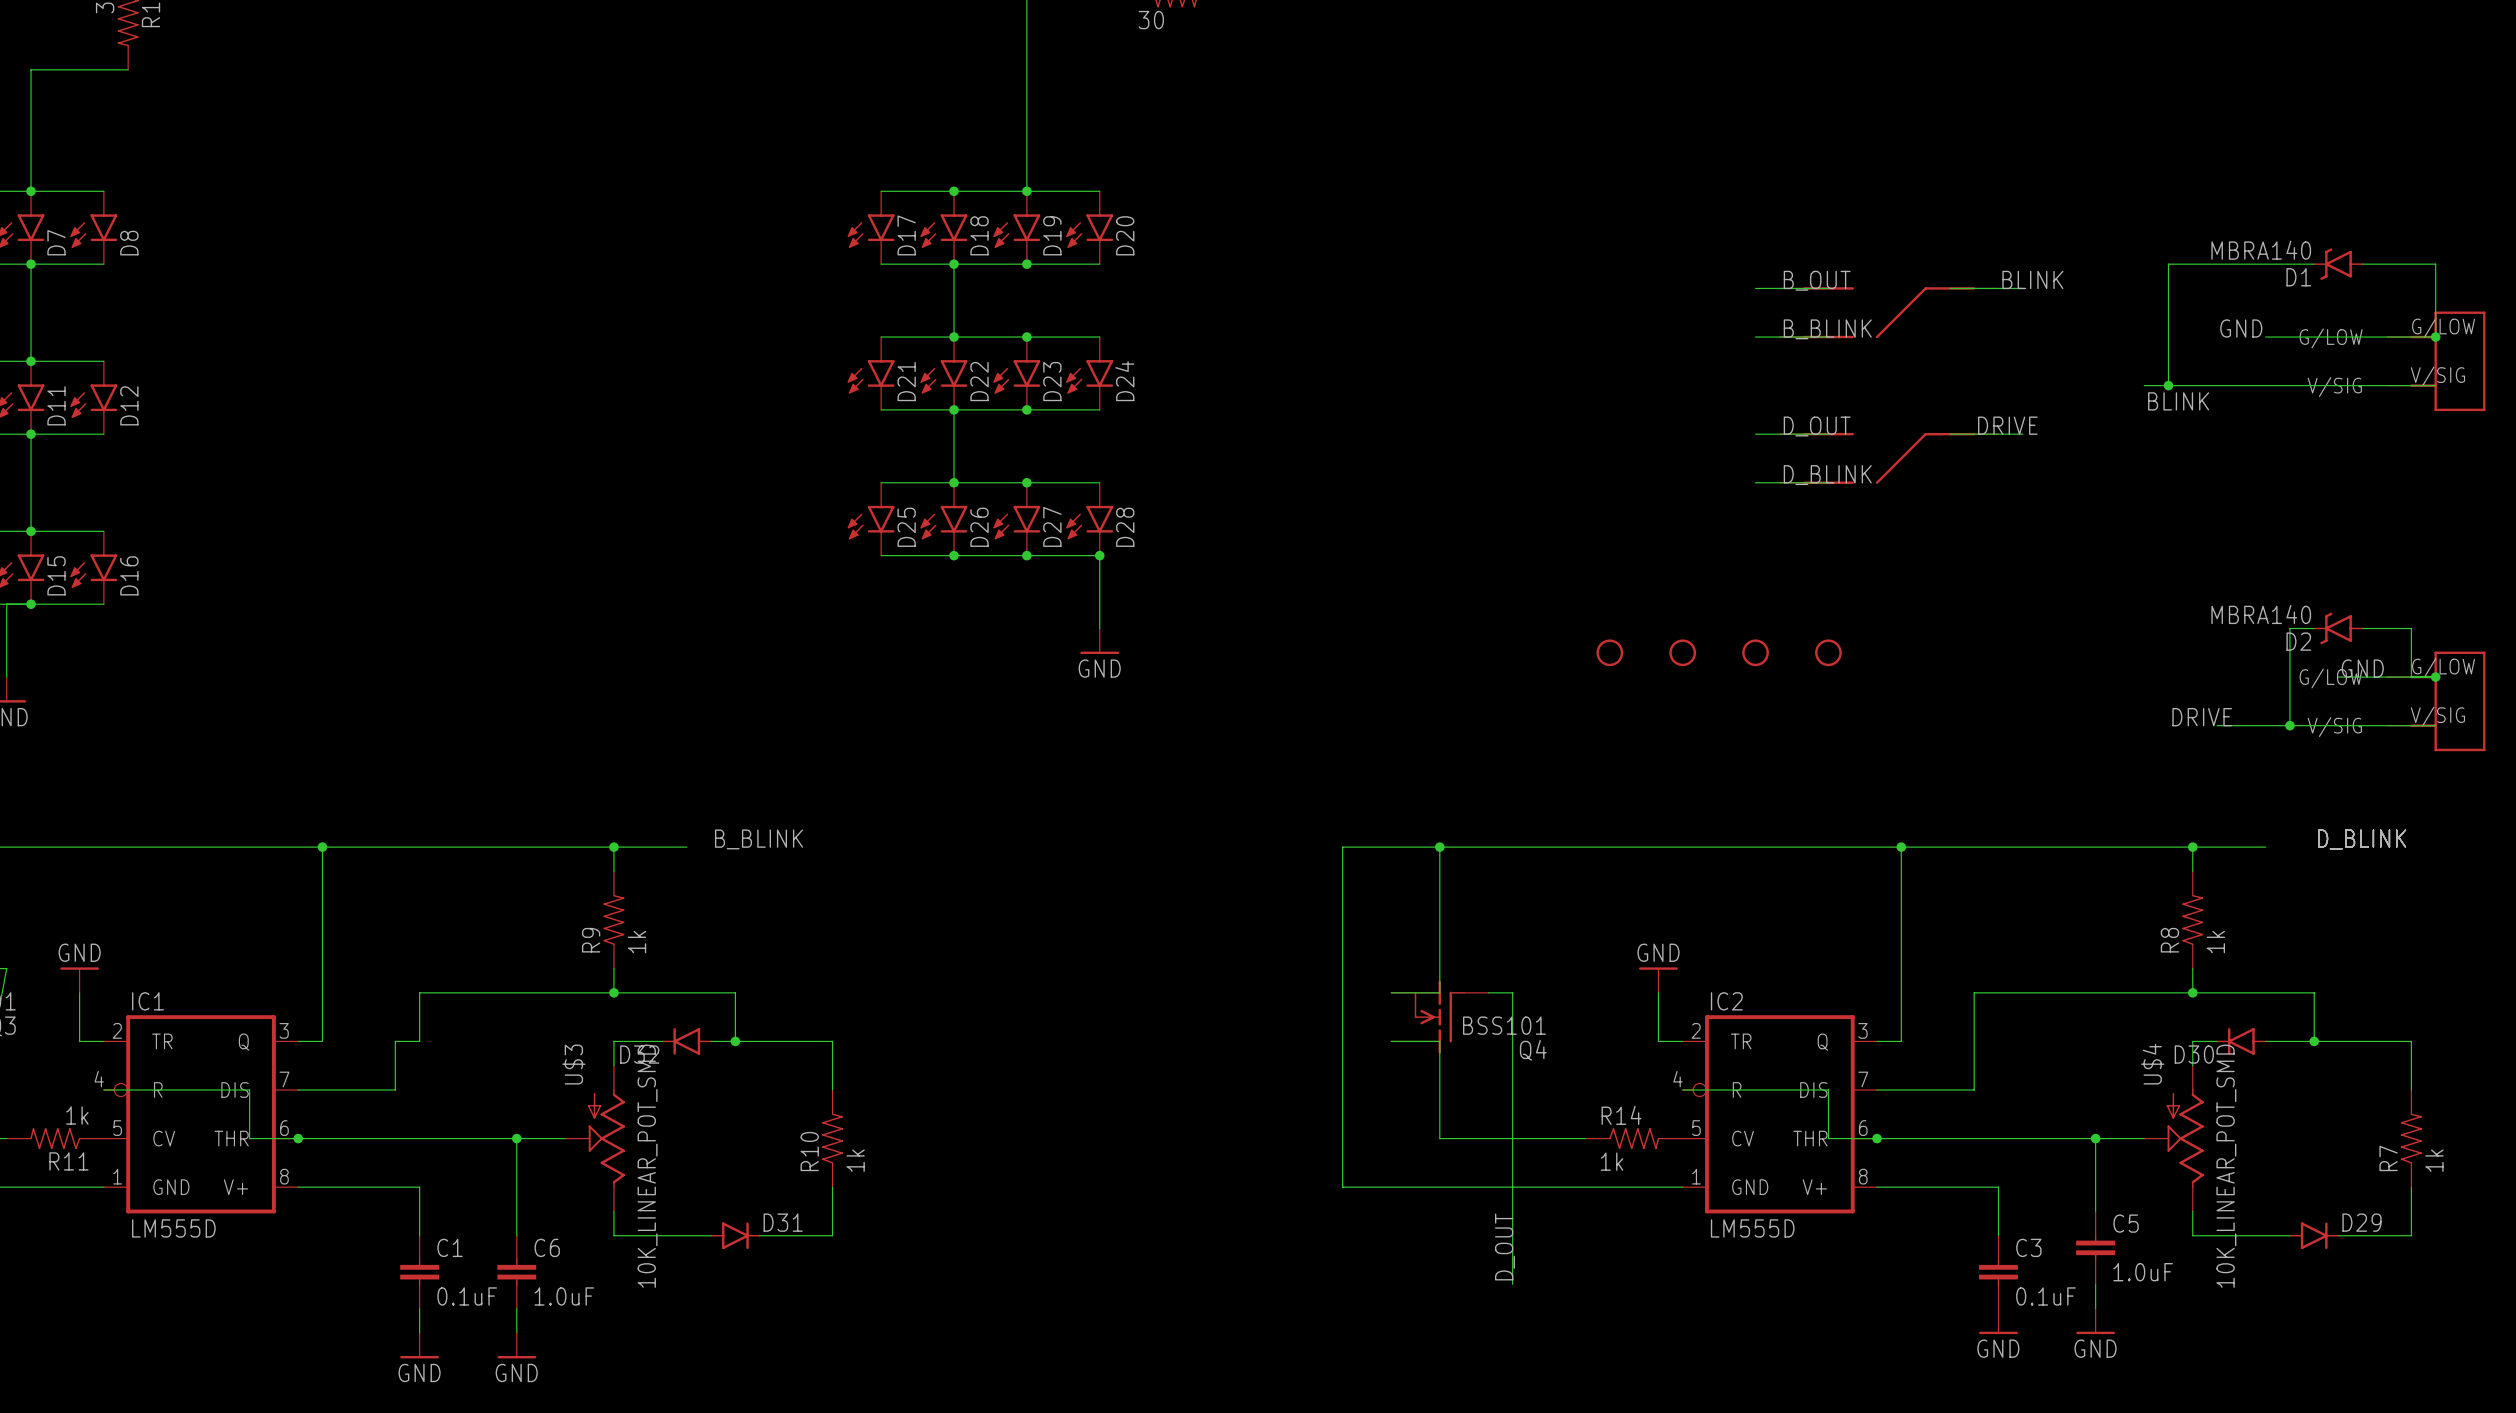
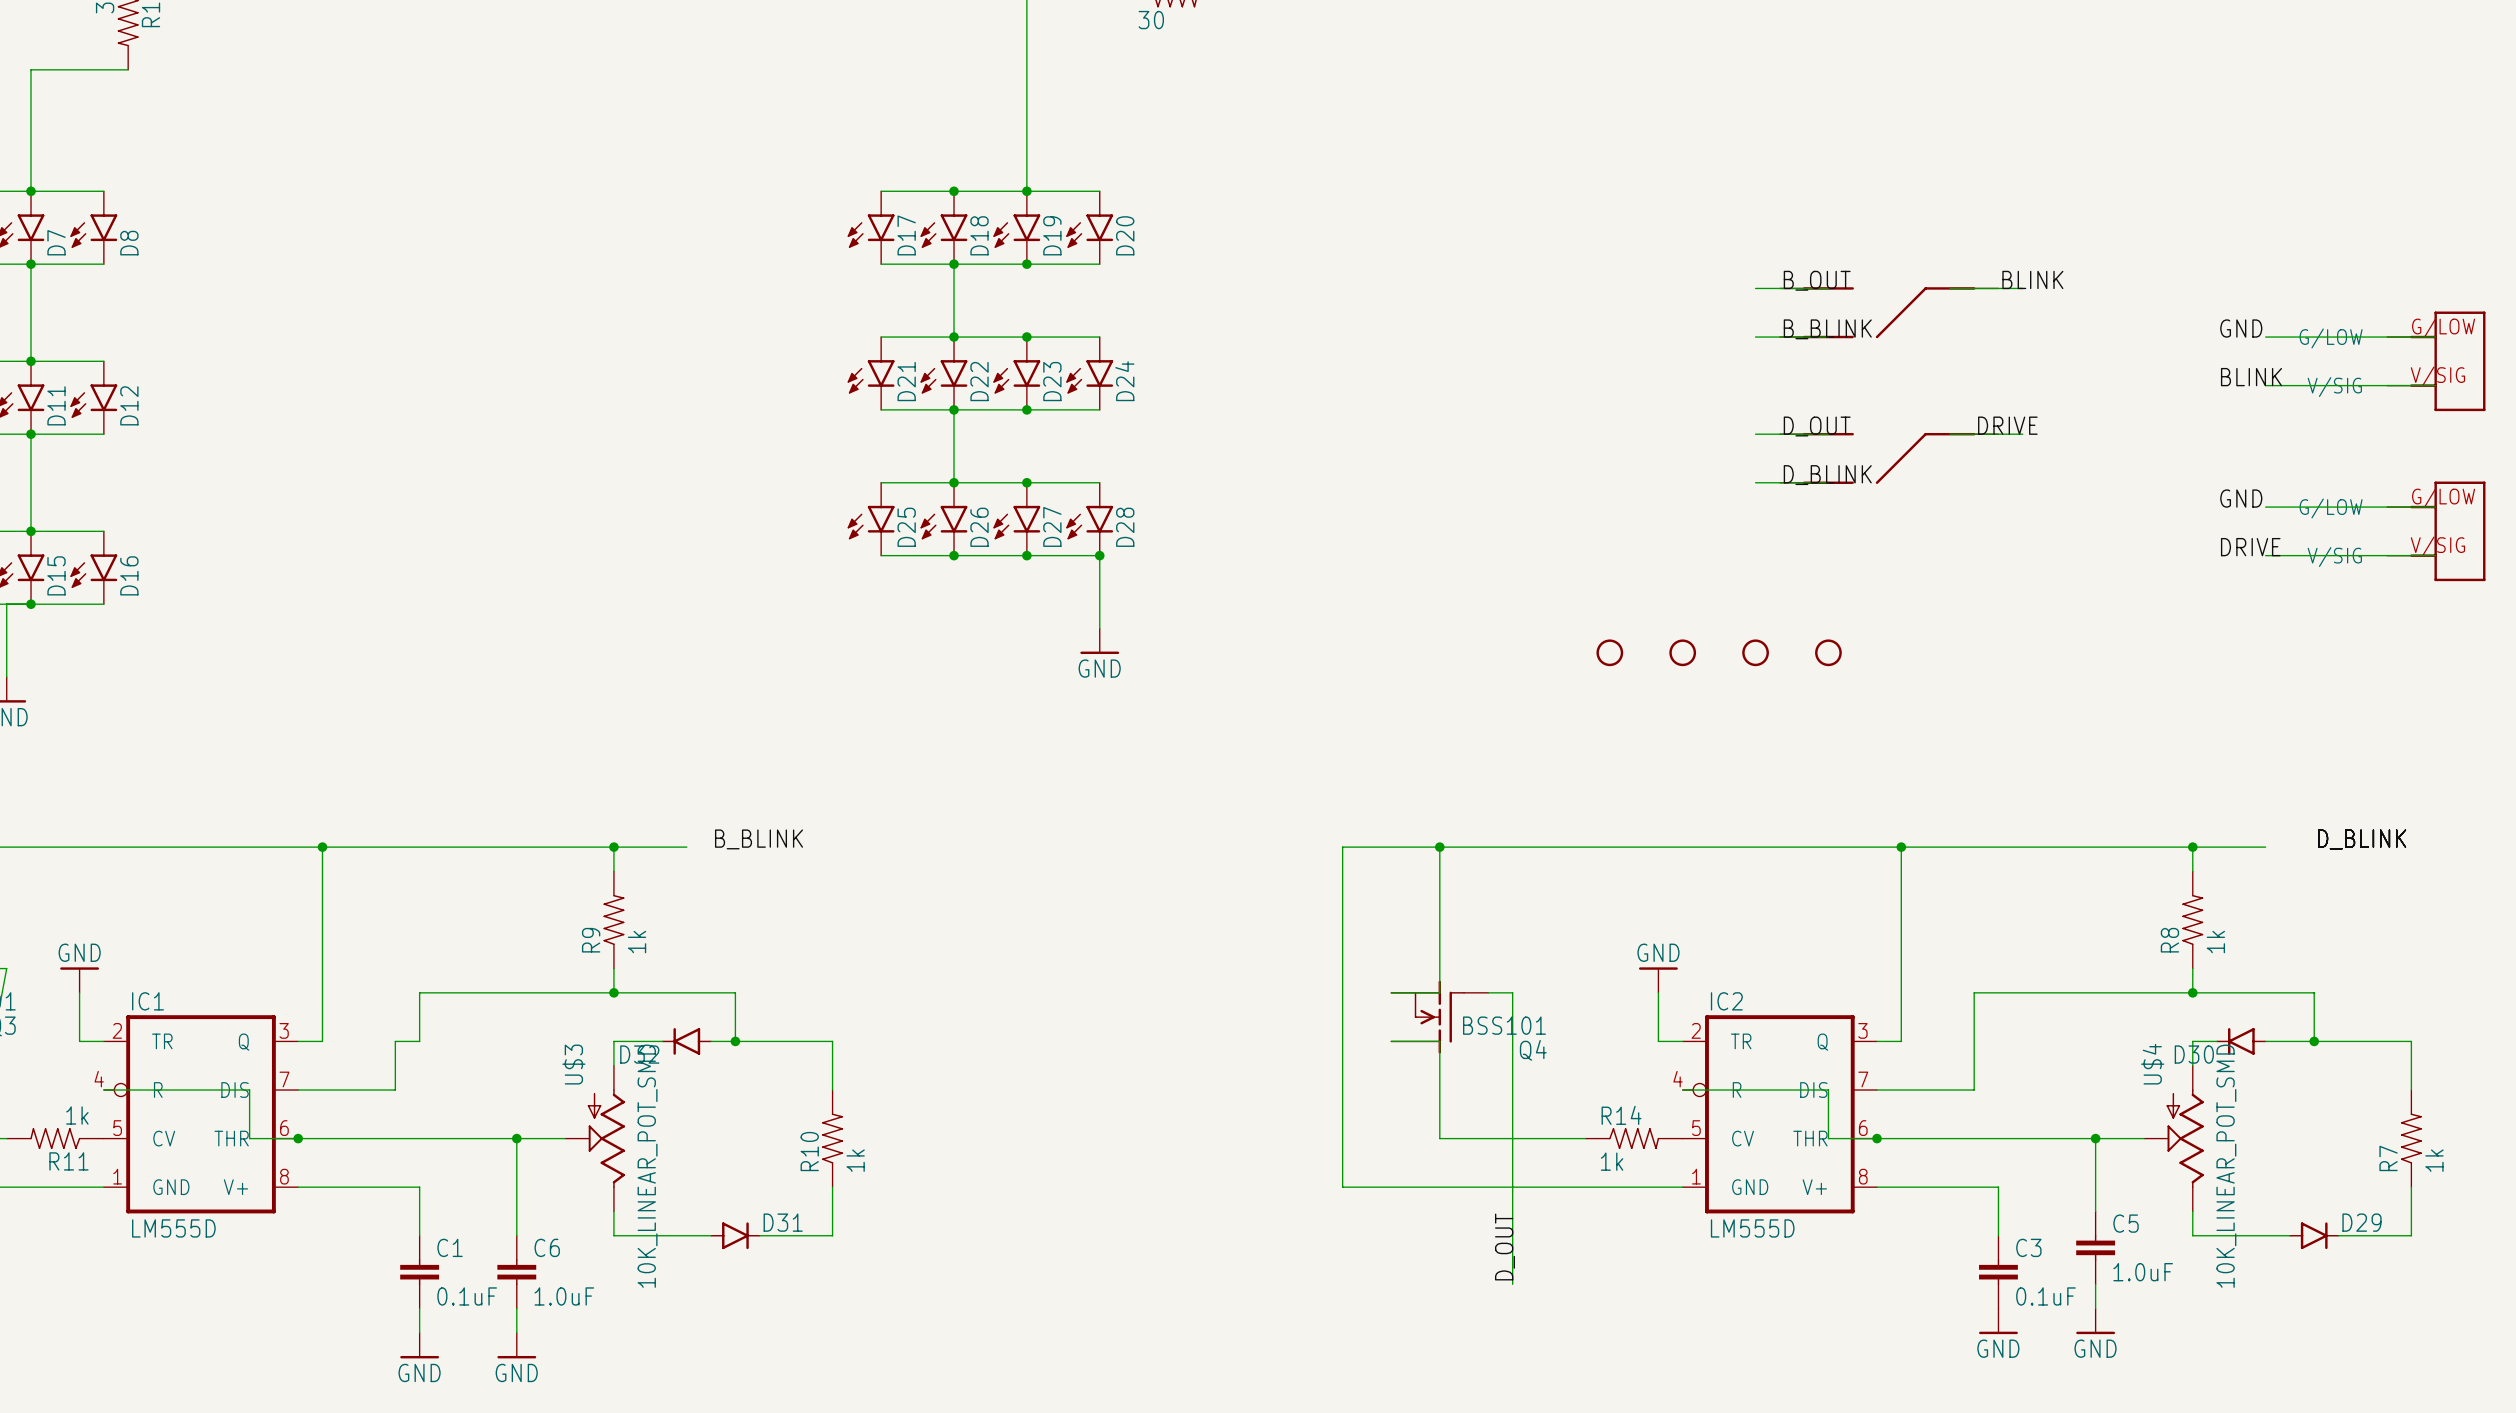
wire: (2314, 264) (2168, 264) (2168, 385) -> none
D1: MBRA140 (2338, 264) -> none
wire: (2362, 264) (2435, 264) (2435, 337) -> none
junction: (2435, 337) -> none
wire: (2144, 385) (2265, 385) -> none
junction: (2168, 385) -> none
label position: BLINK (2178, 401) -> BLINK (2251, 377)
wire: none -> (2265, 507) (2435, 507)
wire: none -> (2265, 555) (2435, 555)
wire: (2314, 628) (2289, 628) (2289, 725) -> none
D2: MBRA140 (2338, 628) -> none
wire: (2362, 628) (2411, 628) (2411, 677) -> none
label position: GND (2362, 668) -> GND (2241, 498)
wire: (2338, 677) (2435, 677) -> none
junction: (2435, 677) -> none
part position: (2436, 701) -> (2436, 531)
label position: DRIVE (2202, 717) -> DRIVE (2250, 547)
wire: (2217, 725) (2435, 725) -> none
junction: (2289, 725) -> none

